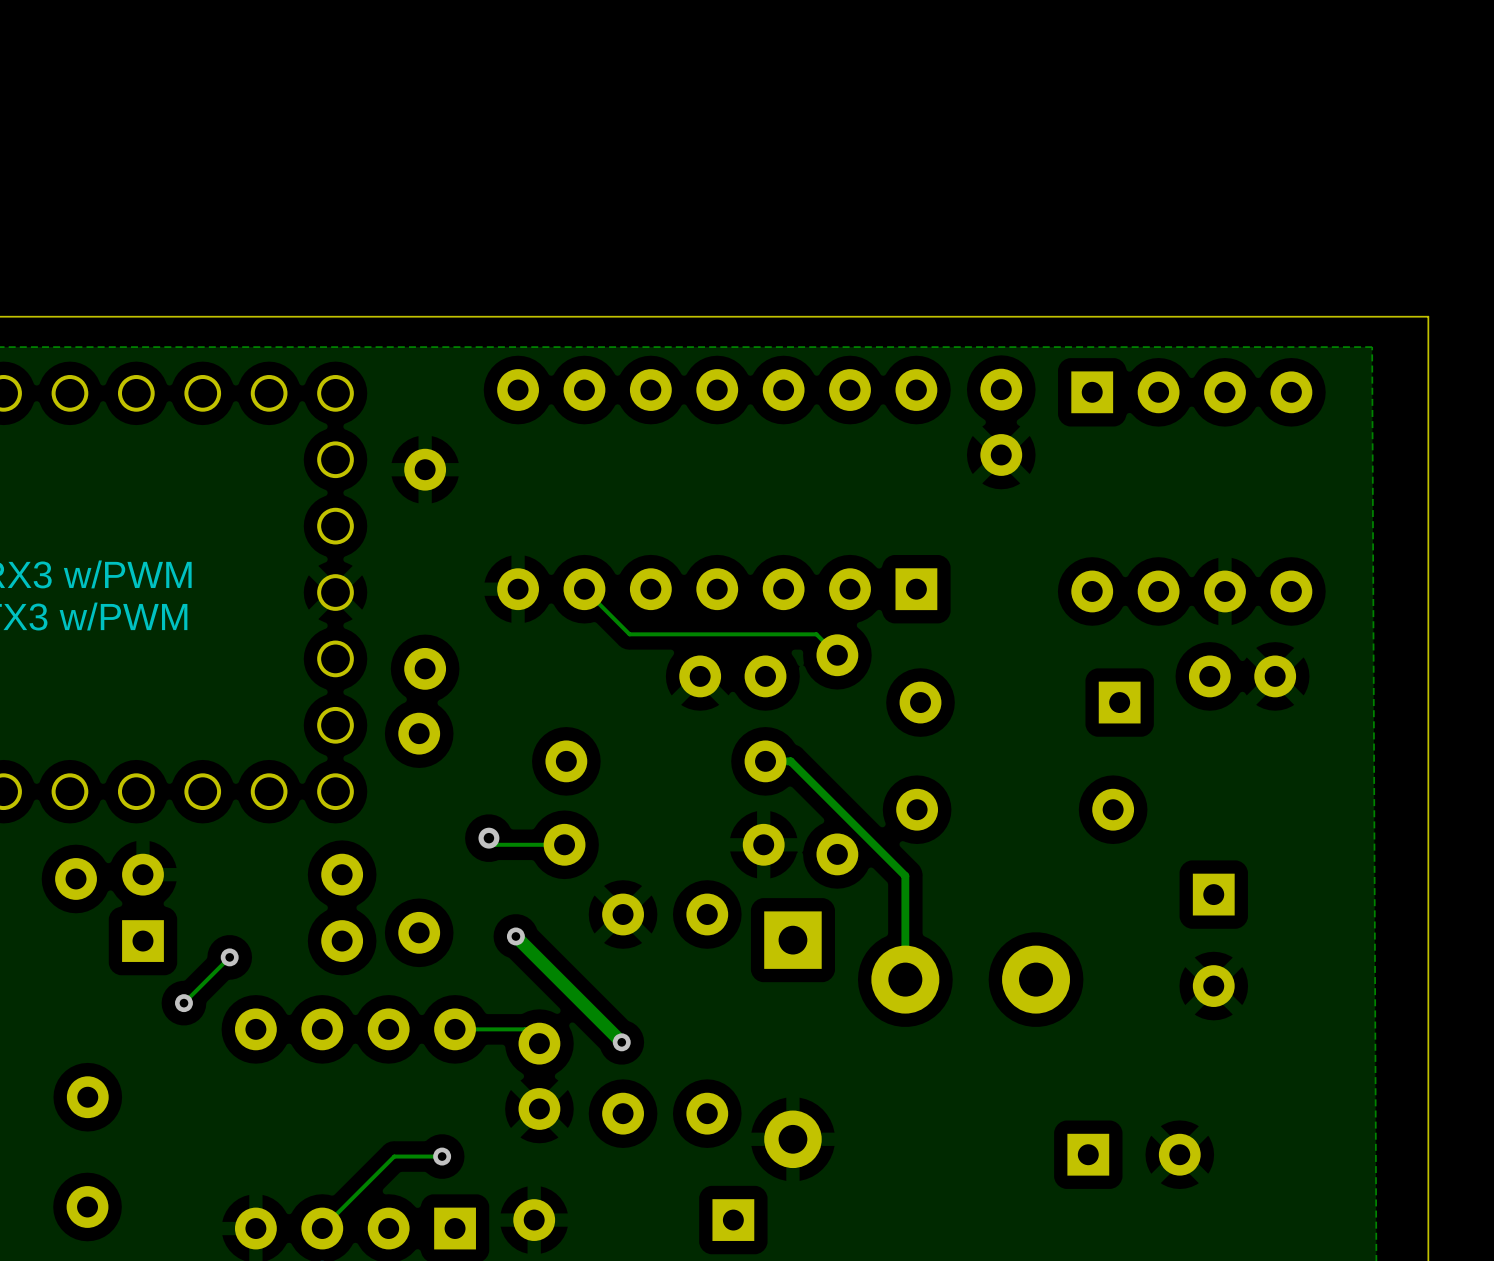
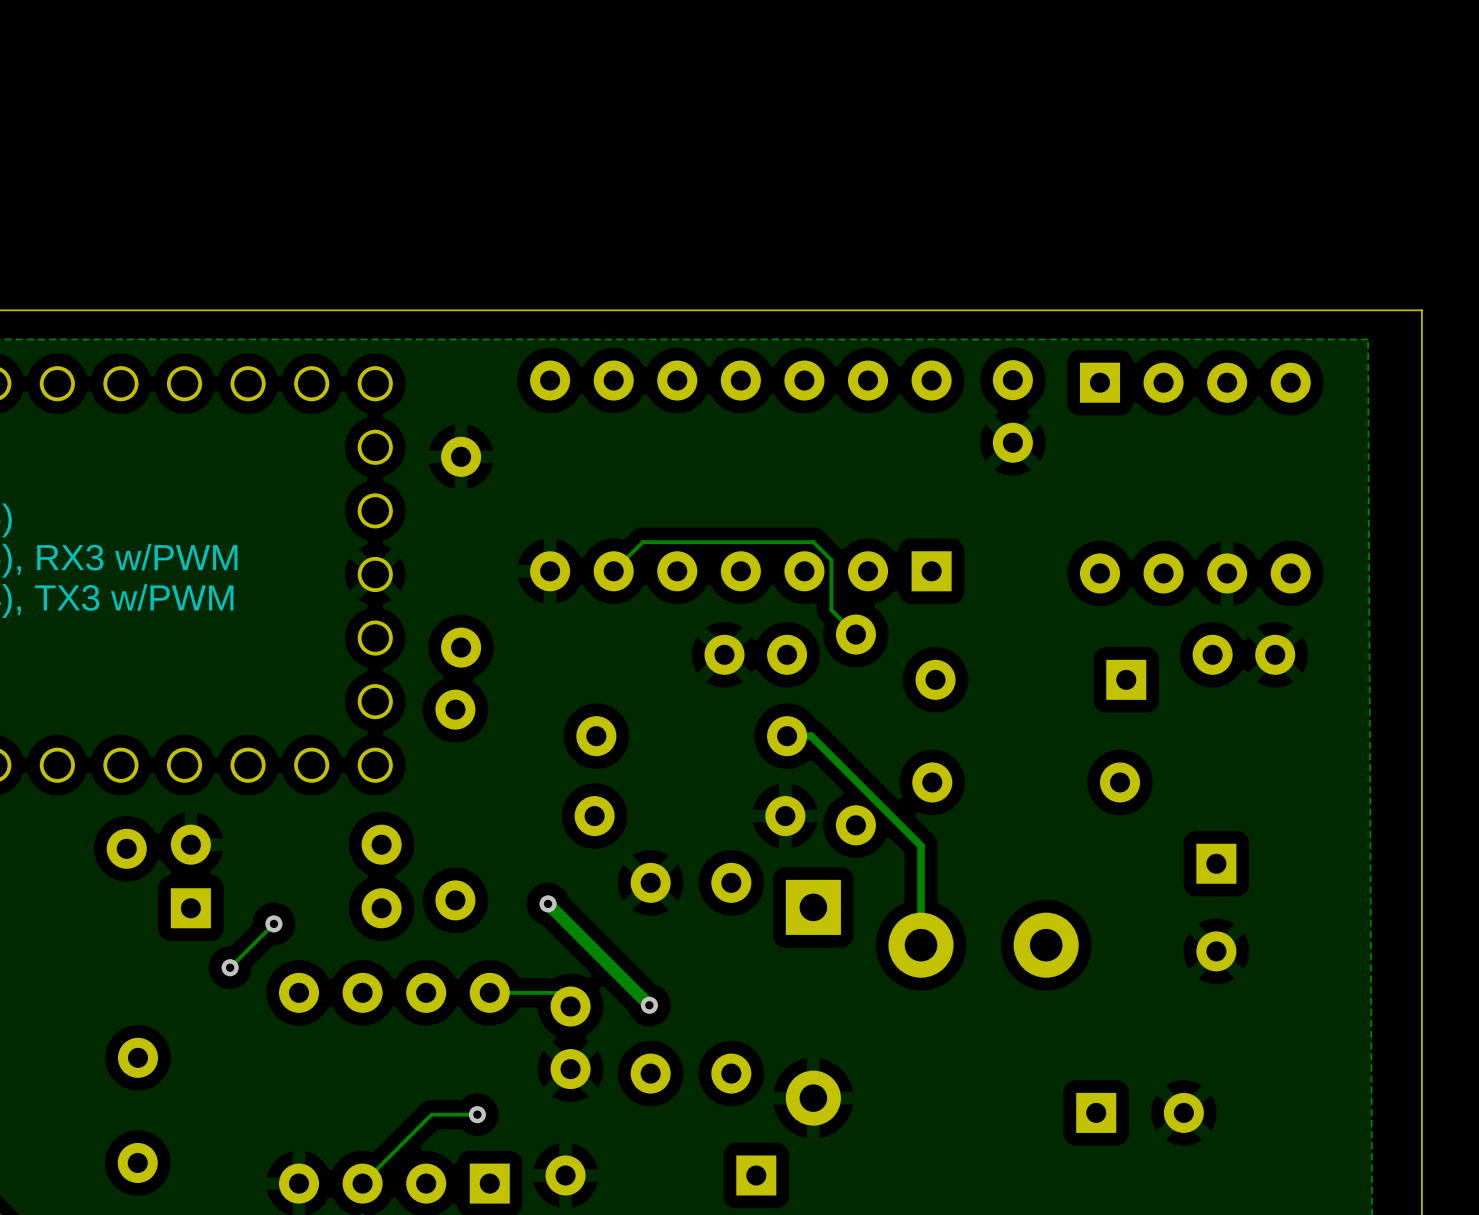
track: (584, 589) (629, 634) (816, 634) -> (613, 571) (642, 542) (813, 542) (831, 560) (831, 609) (835, 614)
track: (488, 838) (495, 844) (564, 844) -> none
via: (488, 838) -> none

